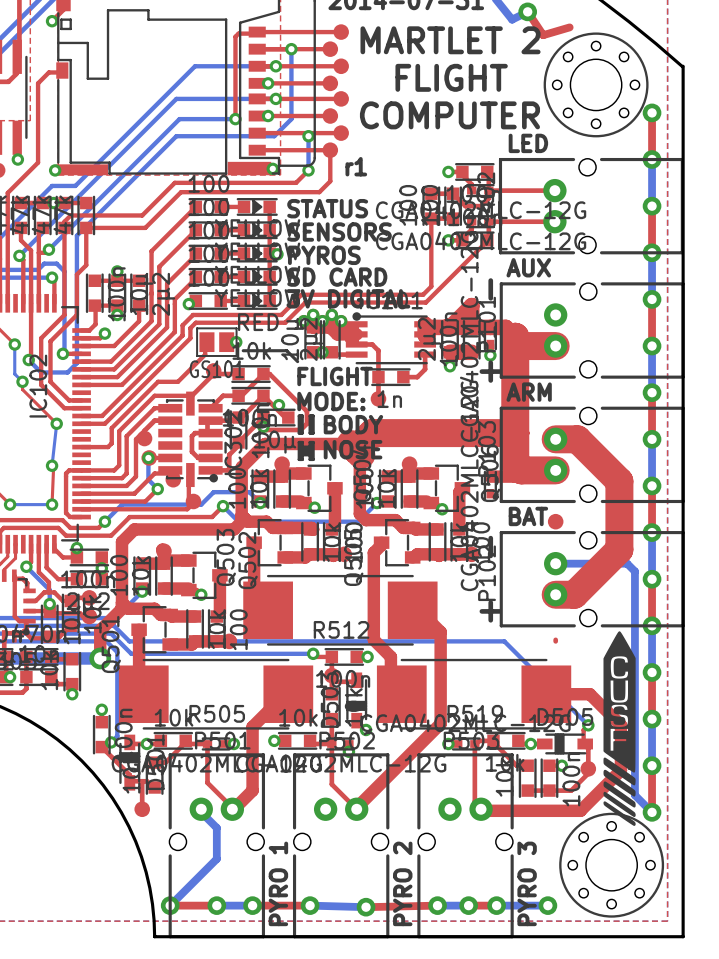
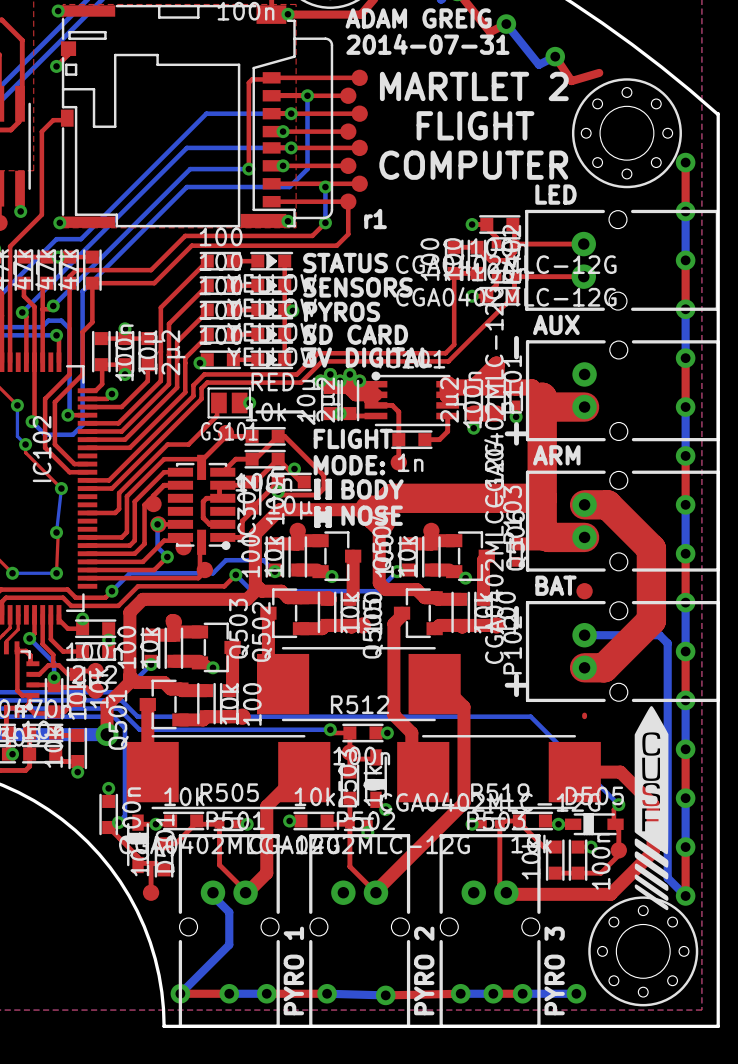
top track: (81, 470) (69, 470) (66, 473) (66, 513) (70, 517) (81, 517) -> none

